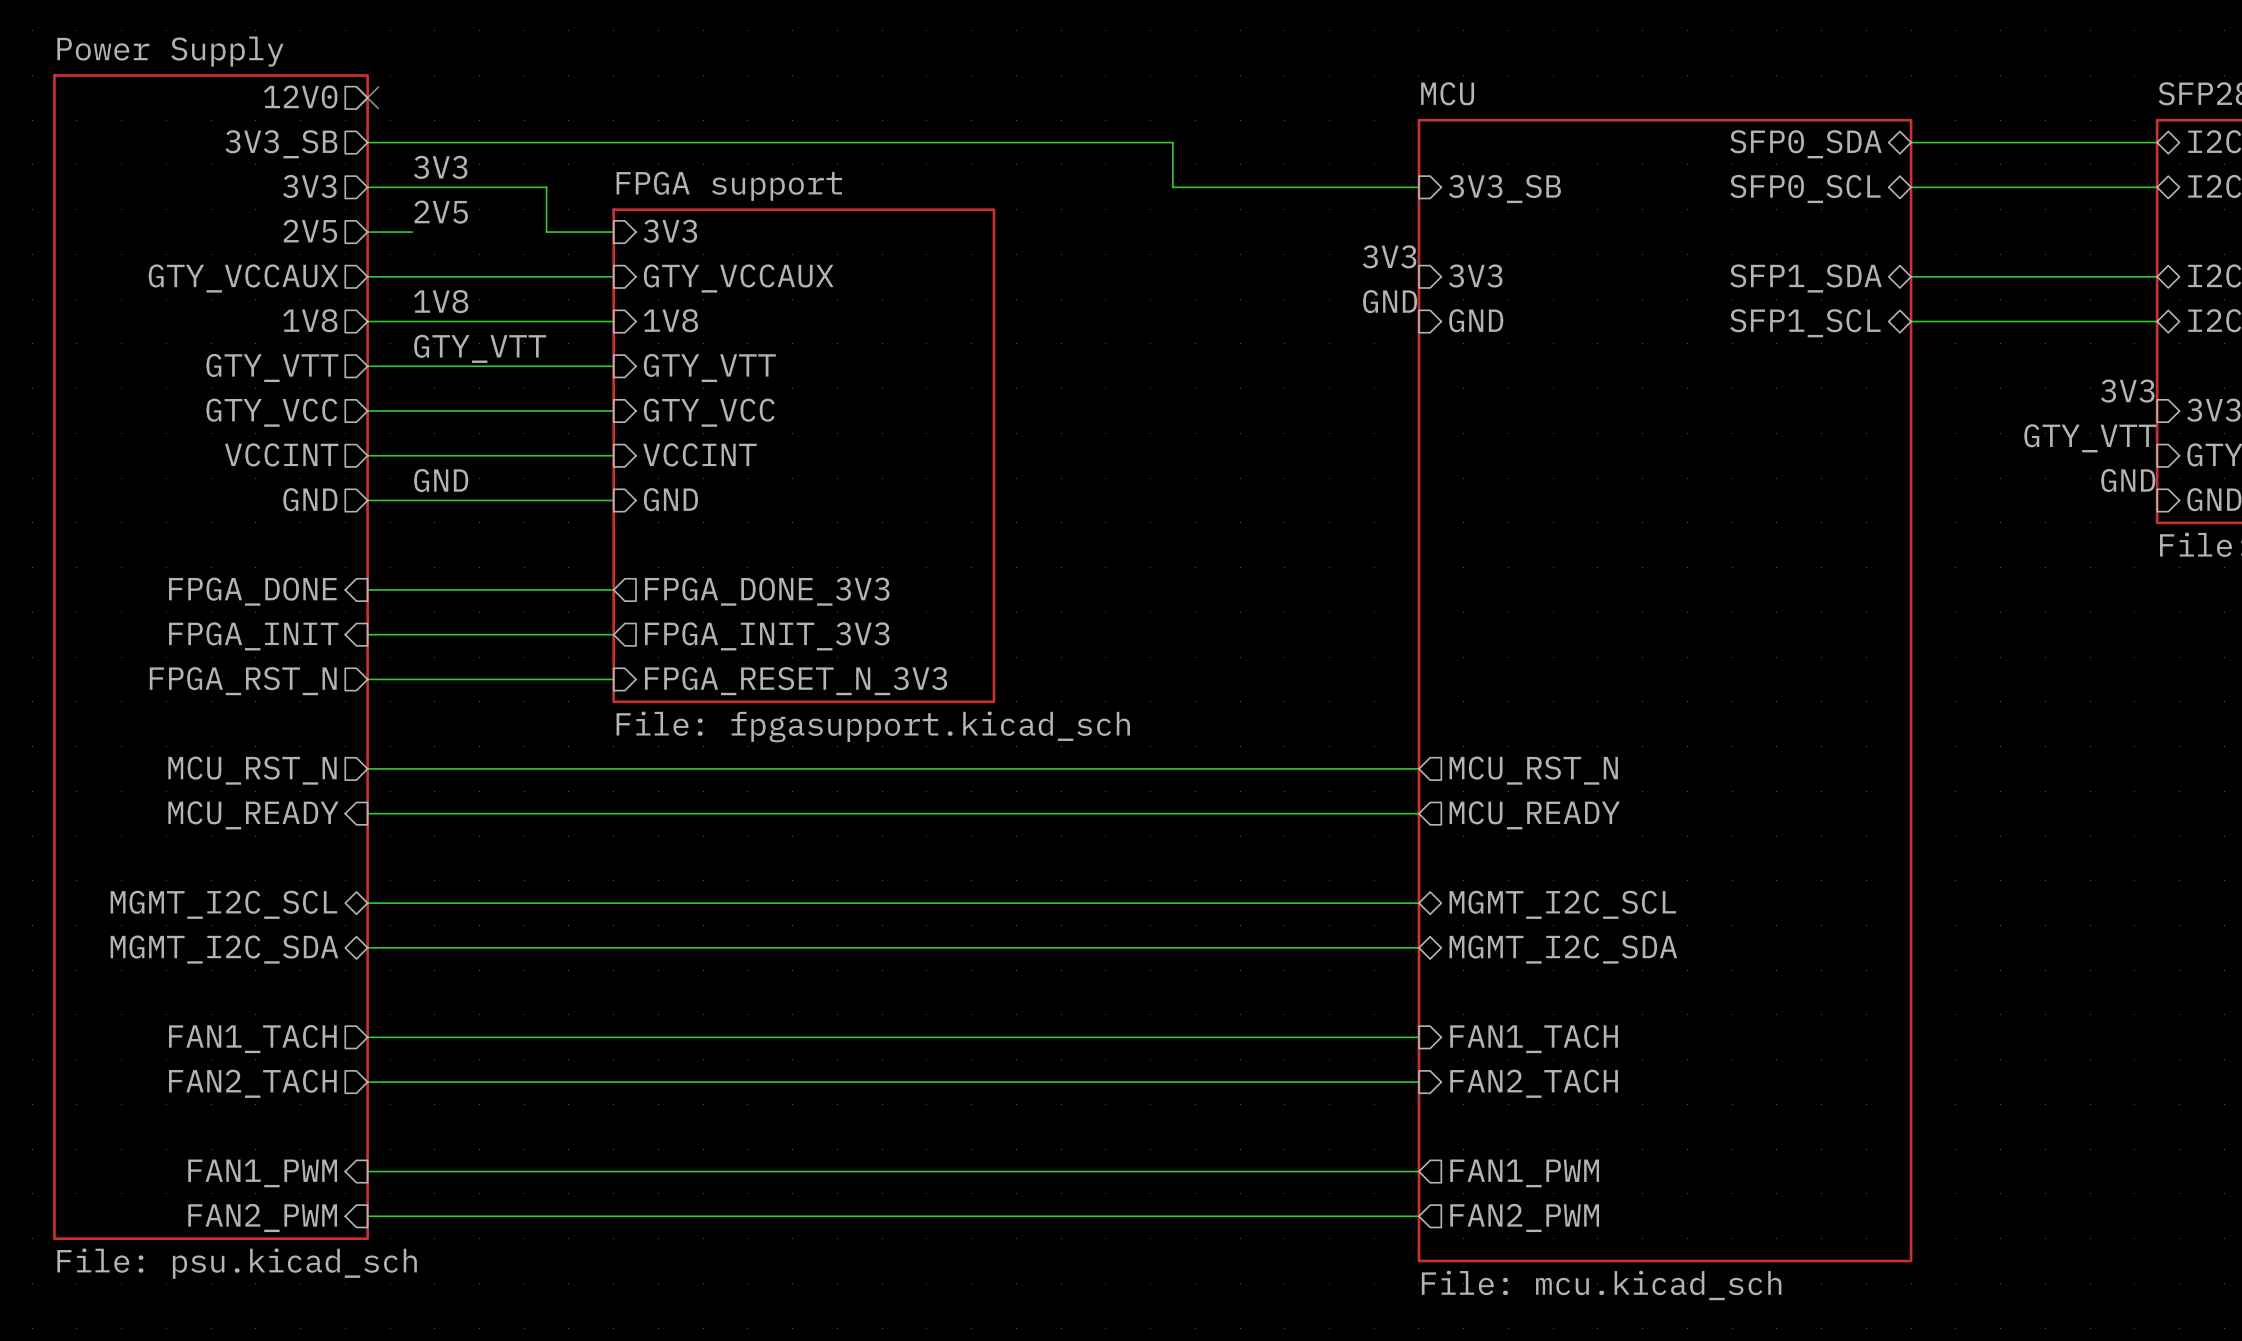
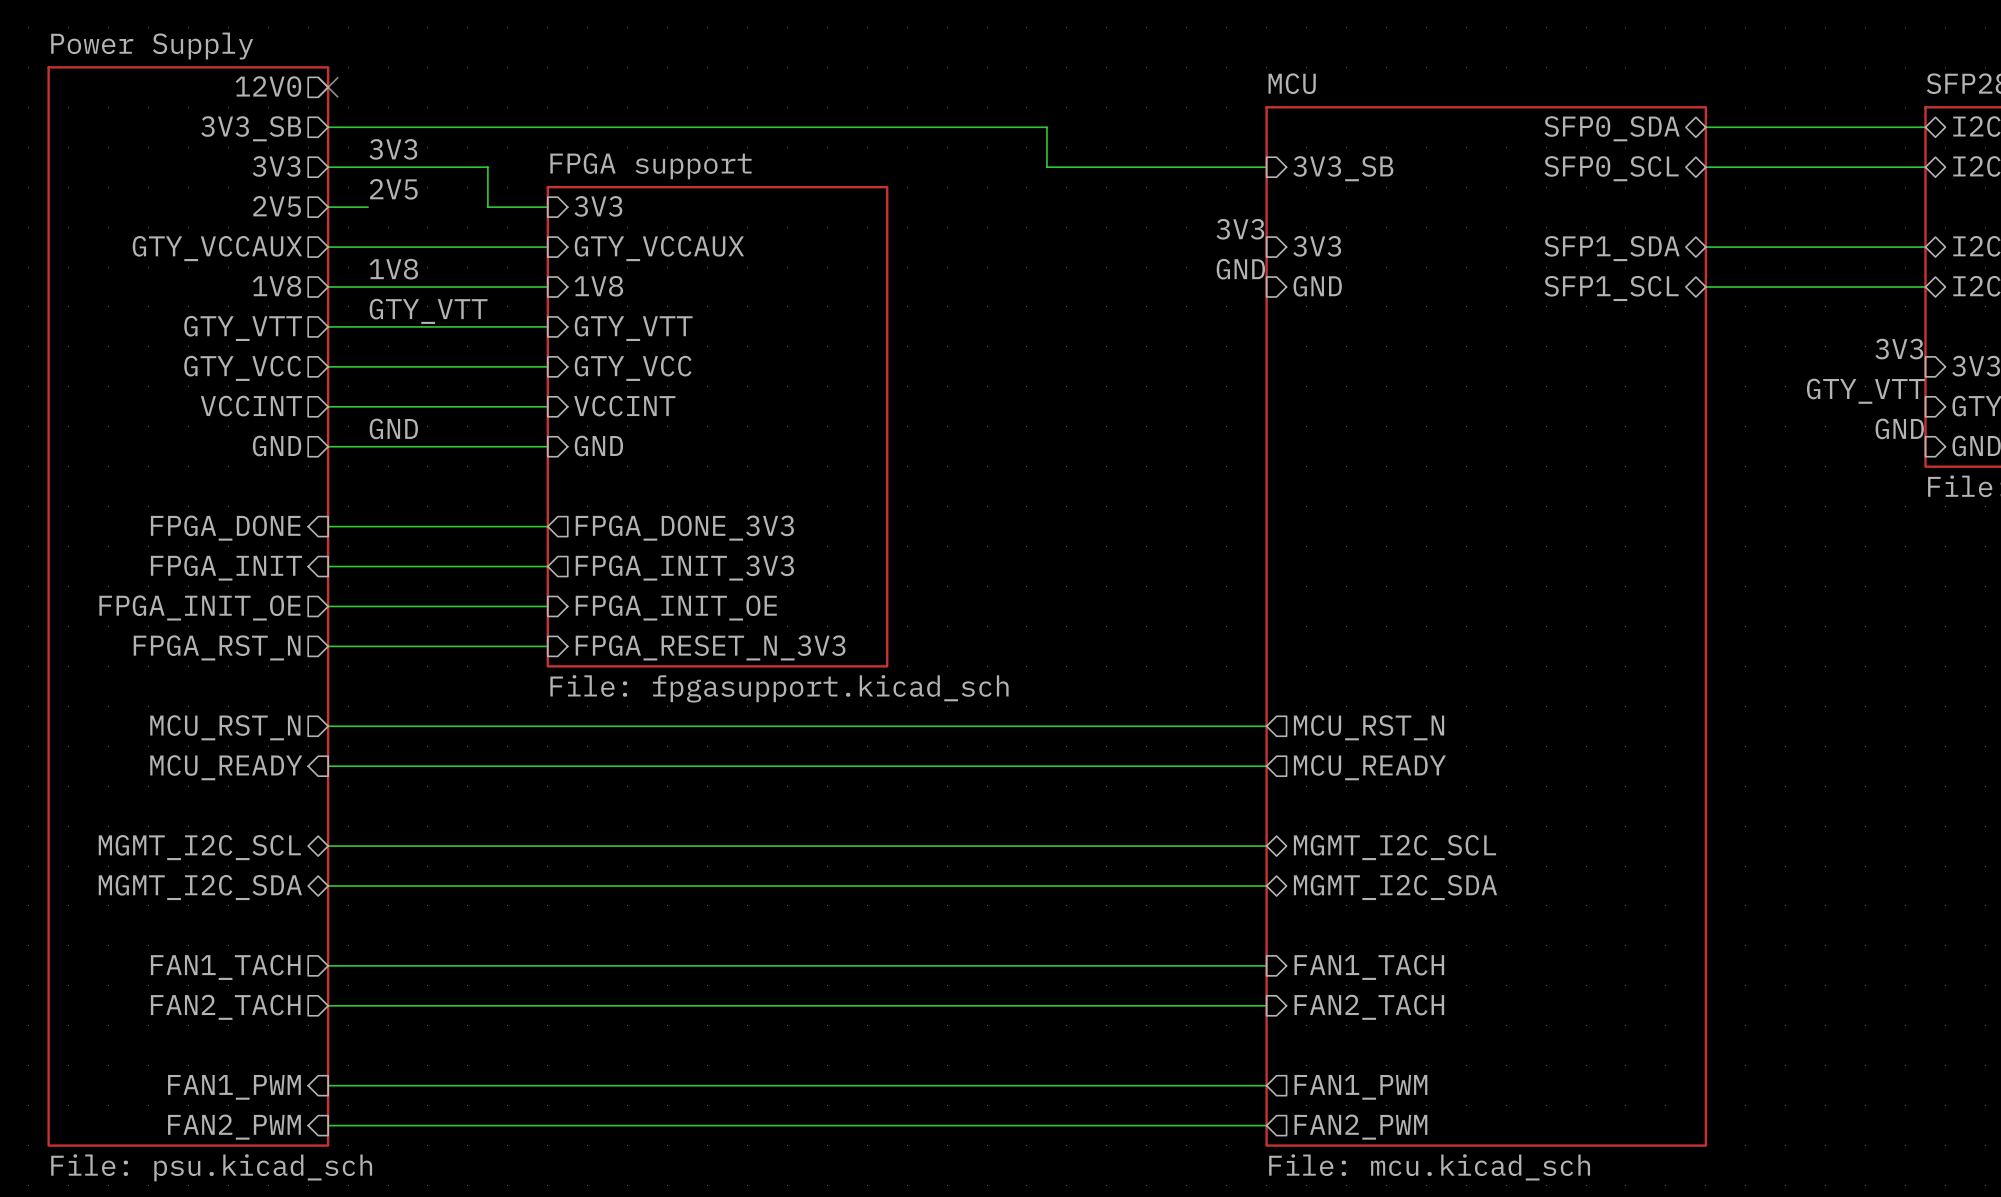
sheet MCU shape: [1417, 118, 1913, 1263] -> [1265, 106, 1708, 1147]
sheet FPGA support: File: fpgasupport.kicad_sch (803, 455) -> none
sheet FPGA support: none -> File: fpgasupport.kicad_sch (717, 426)
sheet Power Supply: File: psu.kicad_sch (211, 657) -> none
sheet Power Supply: none -> File: psu.kicad_sch (188, 606)
sheet pin: FPGA_RST_N (243, 681) -> FPGA_INIT_OE (199, 607)
sheet pin: FPGA_RESET_N_3V3 (796, 681) -> FPGA_INIT_OE (676, 607)
wire: none -> (328, 646) (547, 646)
sheet pin: none -> FPGA_RESET_N_3V3 (710, 647)
wire: (367, 768) (1418, 768) -> (328, 766) (1266, 766)
sheet pin: MCU_RST_N (252, 770) -> FPGA_RST_N (217, 647)
sheet pin: MCU_RST_N (1533, 770) -> none
sheet pin shape: input (253, 815) -> output (225, 727)
sheet pin: MCU_READY (253, 815) -> MCU_RST_N (225, 727)
sheet pin: MCU_READY (1534, 815) -> MCU_RST_N (1369, 727)
sheet pin: none -> MCU_READY (226, 767)
sheet pin: none -> MCU_READY (1369, 767)
wire: (367, 903) (1418, 903) -> (328, 886) (1266, 886)
sheet pin: MGMT_I2C_SCL (223, 904) -> none
sheet pin: MGMT_I2C_SCL (1562, 904) -> none
sheet pin: MGMT_I2C_SDA (224, 949) -> MGMT_I2C_SCL (199, 847)
sheet pin: MGMT_I2C_SDA (1563, 949) -> MGMT_I2C_SCL (1394, 847)
sheet pin: none -> MGMT_I2C_SDA (200, 887)
sheet pin: none -> MGMT_I2C_SDA (1395, 887)
wire: (367, 1037) (1418, 1037) -> (328, 1005) (1266, 1005)
sheet pin: FAN1_TACH (252, 1039) -> none
sheet pin: FAN1_TACH (1534, 1039) -> none
sheet pin: FAN2_TACH (252, 1083) -> FAN1_TACH (225, 967)
sheet pin: FAN2_TACH (1534, 1083) -> FAN1_TACH (1369, 967)
sheet pin: none -> FAN2_TACH (225, 1007)
sheet pin: none -> FAN2_TACH (1369, 1007)
wire: (367, 1171) (1418, 1171) -> (328, 1125) (1266, 1125)
sheet pin: FAN1_PWM (262, 1173) -> none
sheet pin: FAN1_PWM (1524, 1173) -> none
sheet pin: FAN2_PWM (262, 1217) -> FAN1_PWM (234, 1087)
sheet pin: FAN2_PWM (1524, 1217) -> FAN1_PWM (1360, 1087)
sheet pin: none -> FAN2_PWM (234, 1127)
sheet pin: none -> FAN2_PWM (1360, 1127)

